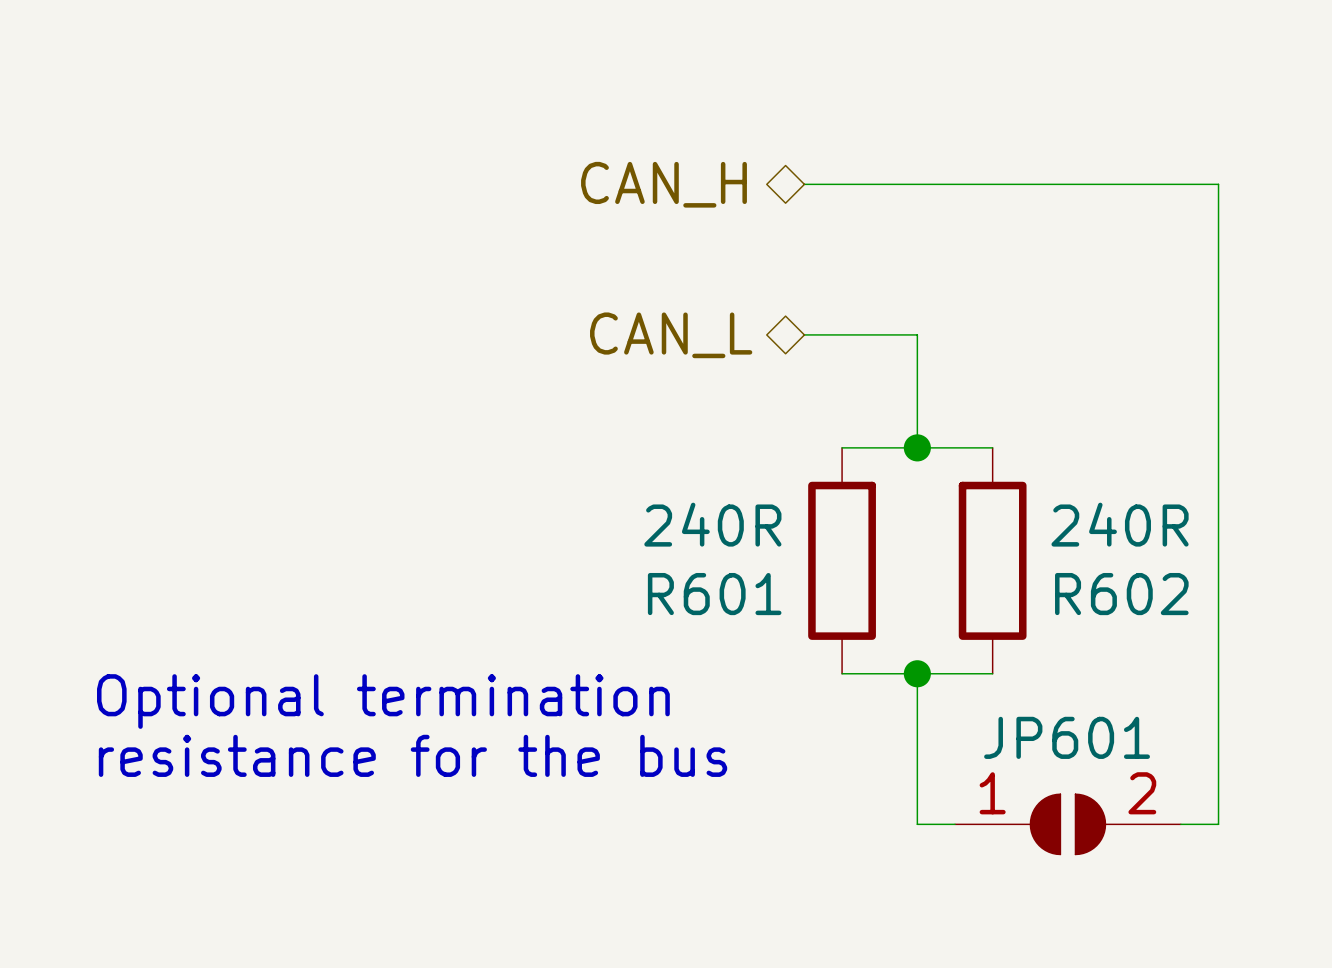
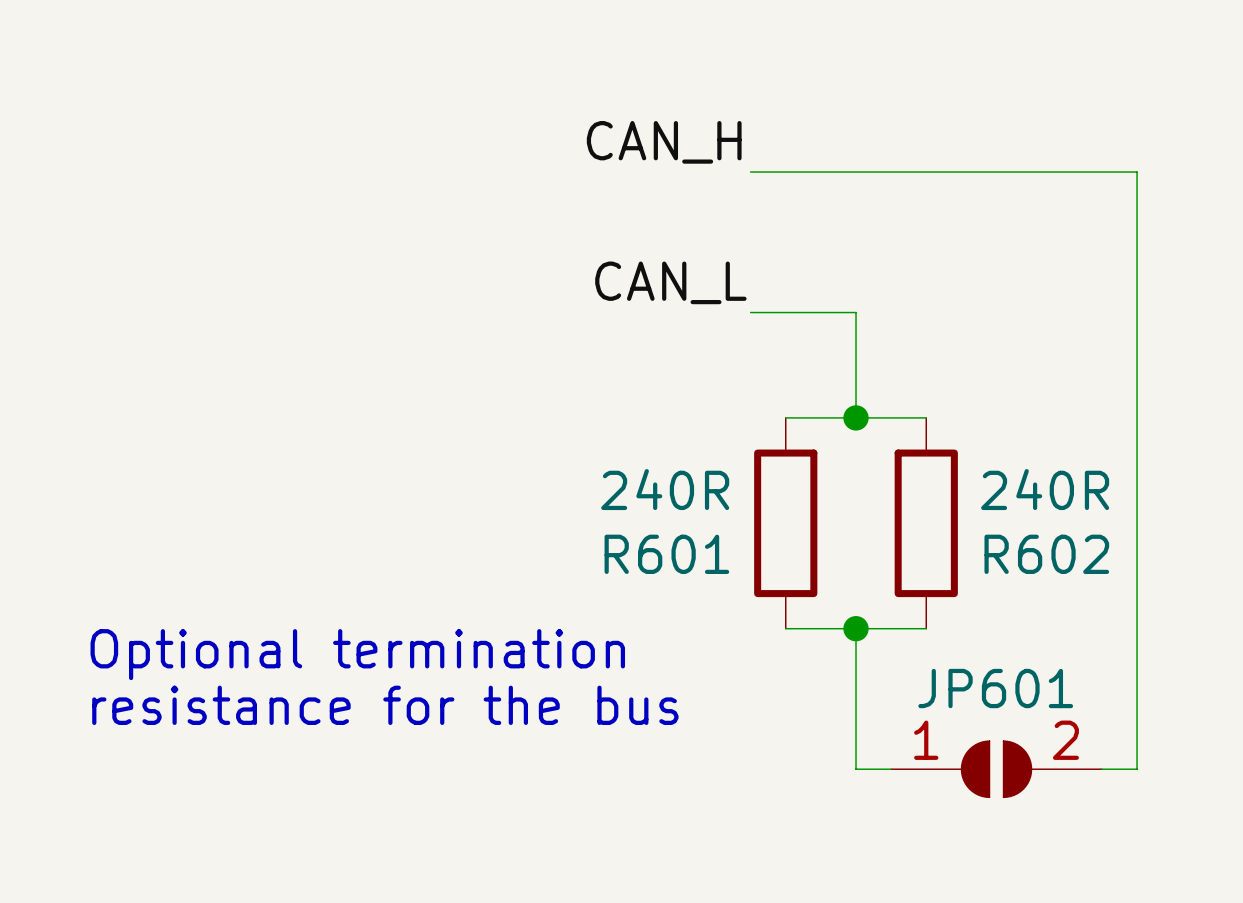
label: none -> CAN_H (664, 142)
hierarchical label: CAN_H (663, 184) -> none
label: none -> CAN_L (670, 282)
hierarchical label: CAN_L (671, 335) -> none

